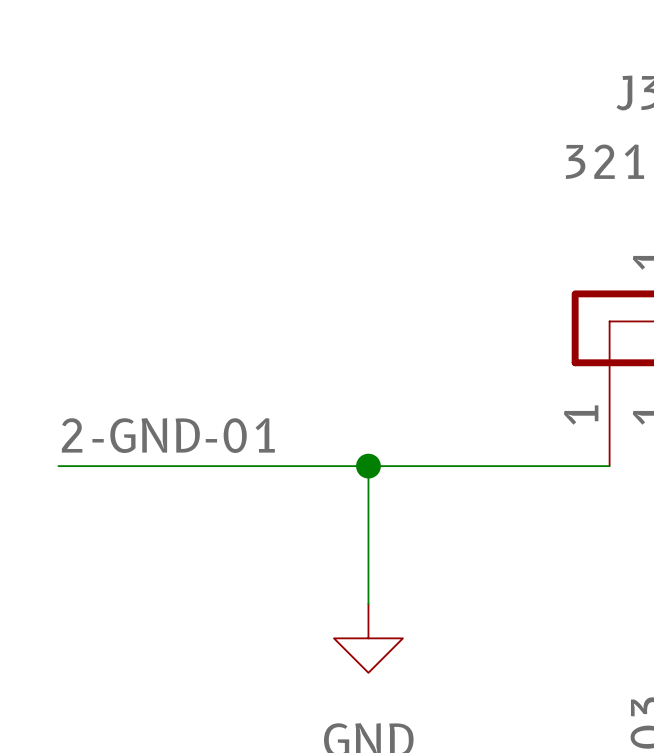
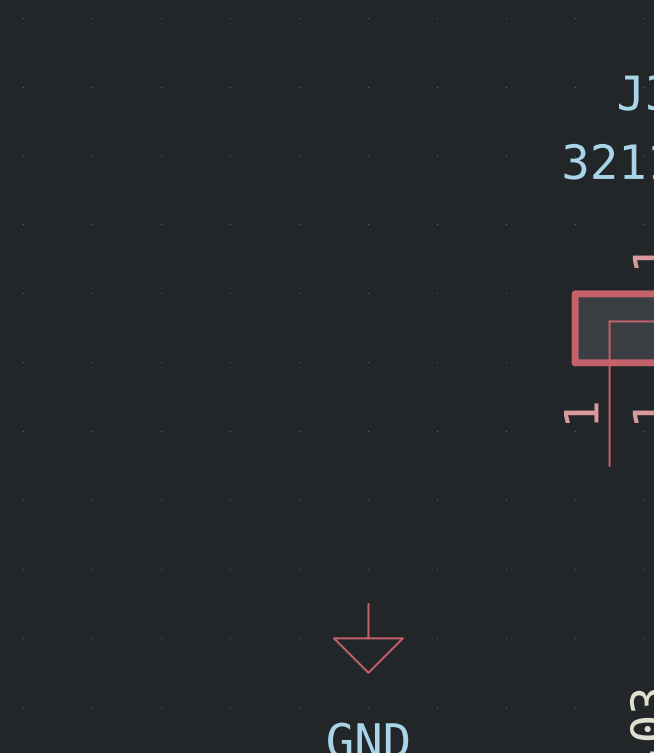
label: 2-GND-01 (168, 435) -> none
wire: (58, 466) (609, 466) -> none
wire: (368, 466) (368, 603) -> none
junction: (368, 466) -> none

